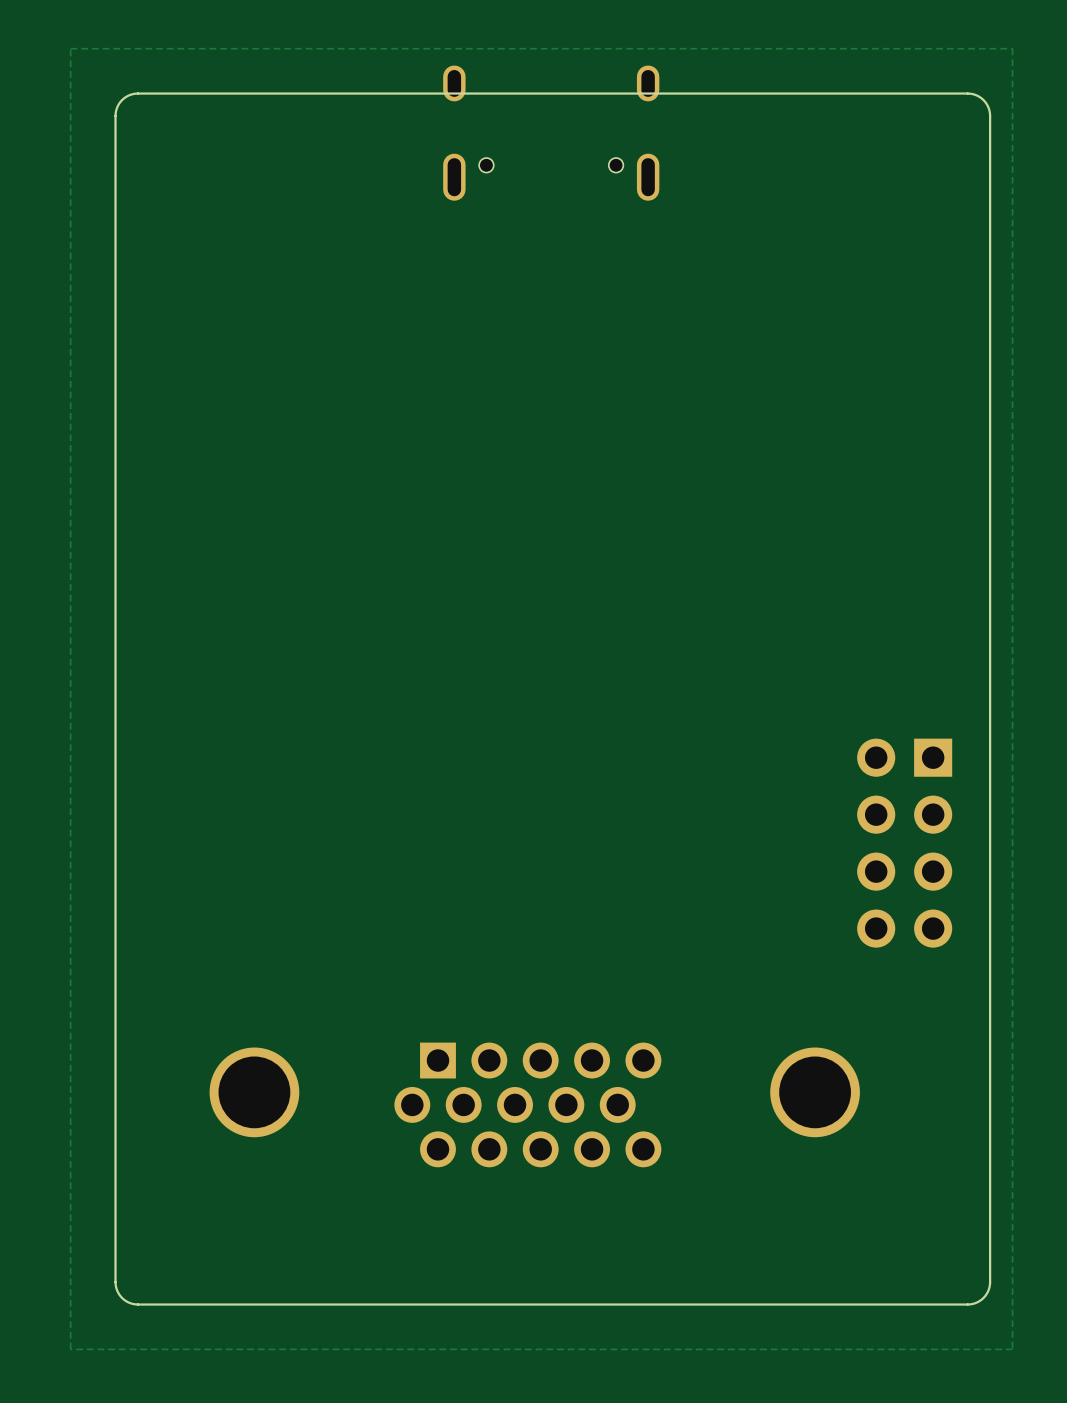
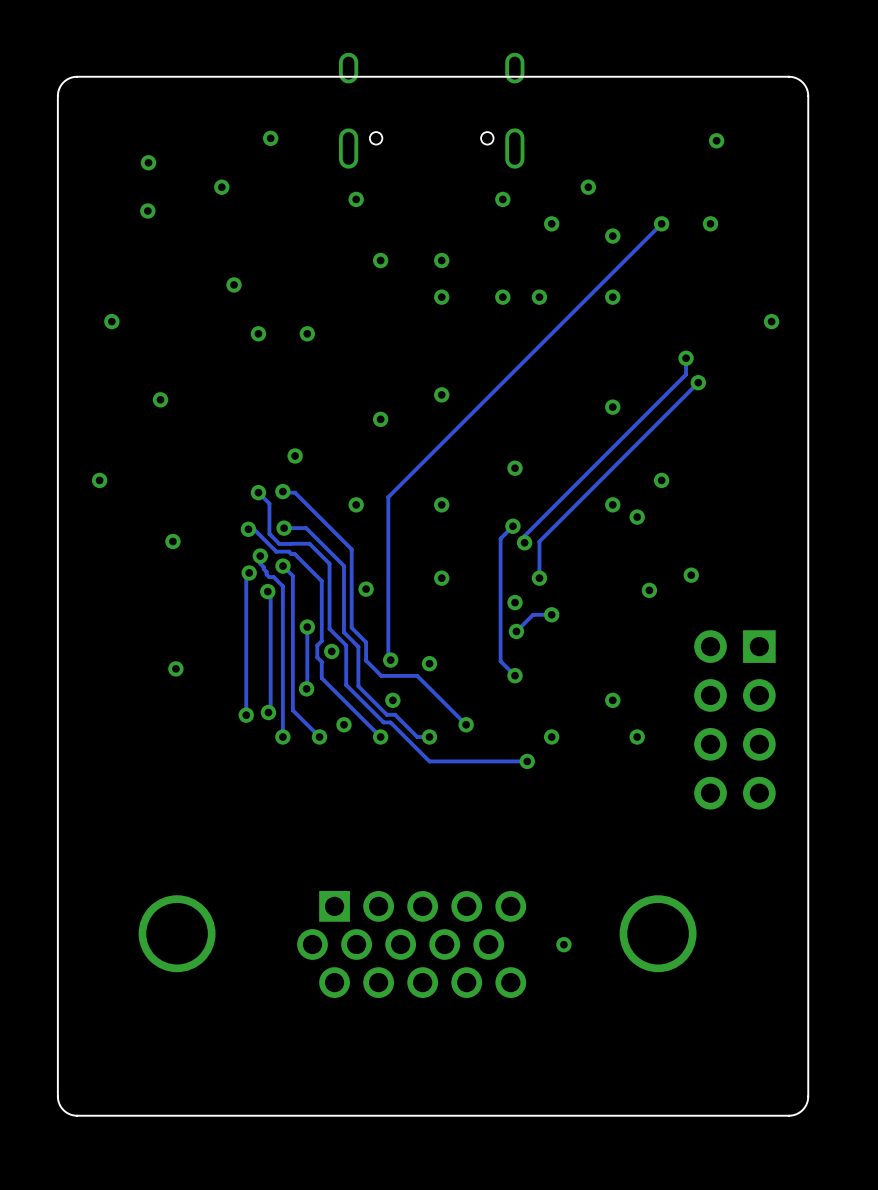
zone outline: (1012, 48) (1012, 1349) (70, 1349) (70, 48) (1012, 48) -> none
via: none -> (270, 138)
via: none -> (716, 140)
via: none -> (148, 162)
via: none -> (221, 187)
via: none -> (588, 187)
via: none -> (356, 199)
via: none -> (502, 199)
via: none -> (147, 210)
via: none -> (551, 223)
track: none -> (661, 223) (388, 497) (388, 657) (390, 660)
via: none -> (661, 223)
via: none -> (710, 223)
via: none -> (612, 236)
via: none -> (380, 260)
via: none -> (441, 260)
via: none -> (234, 284)
via: none -> (441, 297)
via: none -> (502, 297)
via: none -> (539, 297)
via: none -> (612, 297)
via: none -> (111, 321)
via: none -> (771, 321)
via: none -> (258, 333)
via: none -> (307, 333)
track: none -> (686, 358) (686, 374) (524, 535) (524, 542)
via: none -> (686, 358)
track: none -> (698, 382) (539, 541) (539, 578)
via: none -> (698, 382)
via: none -> (441, 394)
via: none -> (160, 399)
via: none -> (612, 407)
via: none -> (380, 419)
via: none -> (295, 455)
via: none -> (515, 468)
via: none -> (99, 480)
via: none -> (661, 480)
track: none -> (282, 491) (294, 492) (351, 549) (351, 627) (366, 642) (366, 660) (381, 675) (417, 675) (466, 724)
via: none -> (282, 491)
track: none -> (258, 492) (269, 503) (269, 533) (279, 543) (290, 543)
via: none -> (258, 492)
via: none -> (356, 504)
via: none -> (441, 504)
via: none -> (612, 504)
via: none -> (637, 517)
track: none -> (512, 526) (500, 538) (500, 661) (515, 675)
via: none -> (512, 526)
track: none -> (284, 528) (306, 528) (343, 565) (343, 632) (358, 646) (358, 686) (386, 714) (395, 714) (417, 736) (429, 736)
via: none -> (284, 528)
track: none -> (248, 529) (253, 529) (276, 551) (289, 551) (294, 553) (321, 581) (321, 641) (317, 645) (317, 657) (321, 661) (321, 678) (380, 736)
via: none -> (248, 529)
via: none -> (172, 541)
via: none -> (524, 542)
track: none -> (290, 543) (309, 543) (329, 563) (329, 628) (346, 645) (346, 684) (383, 722) (390, 722) (429, 761) (527, 761)
track: none -> (260, 556) (260, 563) (266, 574) (269, 577) (273, 577) (282, 586) (282, 736)
via: none -> (260, 556)
track: none -> (283, 566) (292, 575) (292, 710) (319, 736)
via: none -> (283, 566)
track: none -> (249, 572) (246, 575) (246, 715)
via: none -> (249, 572)
via: none -> (691, 575)
via: none -> (441, 578)
via: none -> (539, 578)
via: none -> (366, 589)
via: none -> (649, 590)
track: none -> (267, 591) (270, 594) (270, 710) (268, 712)
via: none -> (267, 591)
via: none -> (515, 602)
track: none -> (551, 614) (533, 614) (516, 631)
via: none -> (551, 614)
track: none -> (307, 627) (306, 688)
via: none -> (307, 627)
via: none -> (516, 631)
via: none -> (331, 651)
via: none -> (390, 660)
via: none -> (429, 663)
via: none -> (175, 668)
via: none -> (515, 675)
via: none -> (306, 688)
via: none -> (392, 700)
via: none -> (612, 700)
via: none -> (268, 712)
via: none -> (246, 715)
via: none -> (343, 724)
via: none -> (466, 724)
via: none -> (282, 736)
via: none -> (319, 736)
via: none -> (380, 736)
via: none -> (429, 736)
via: none -> (551, 736)
via: none -> (637, 736)
via: none -> (527, 761)
via: none -> (563, 944)

